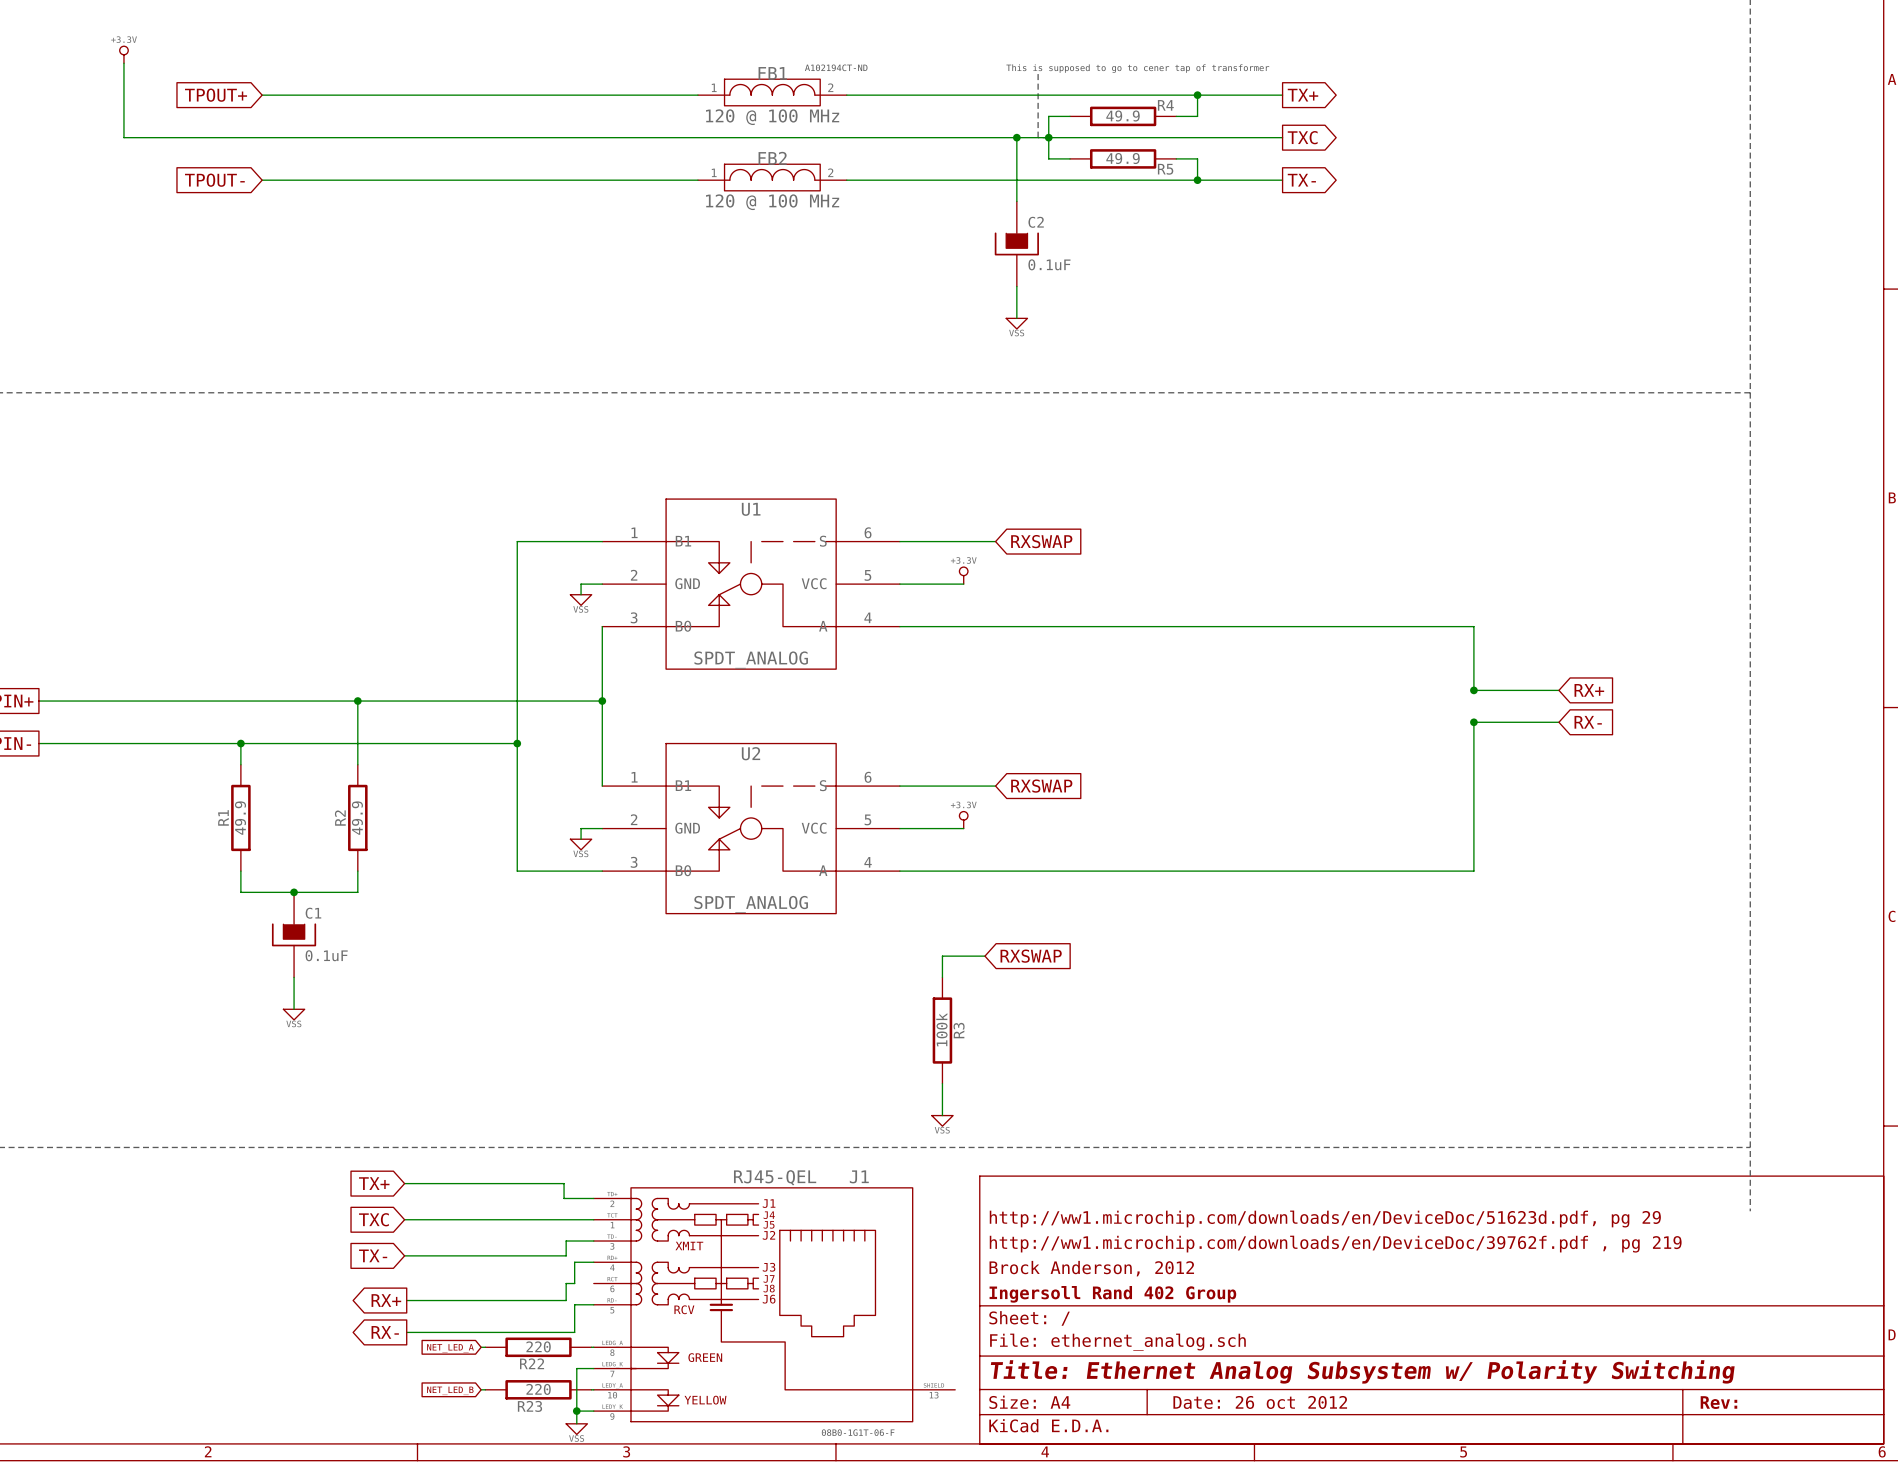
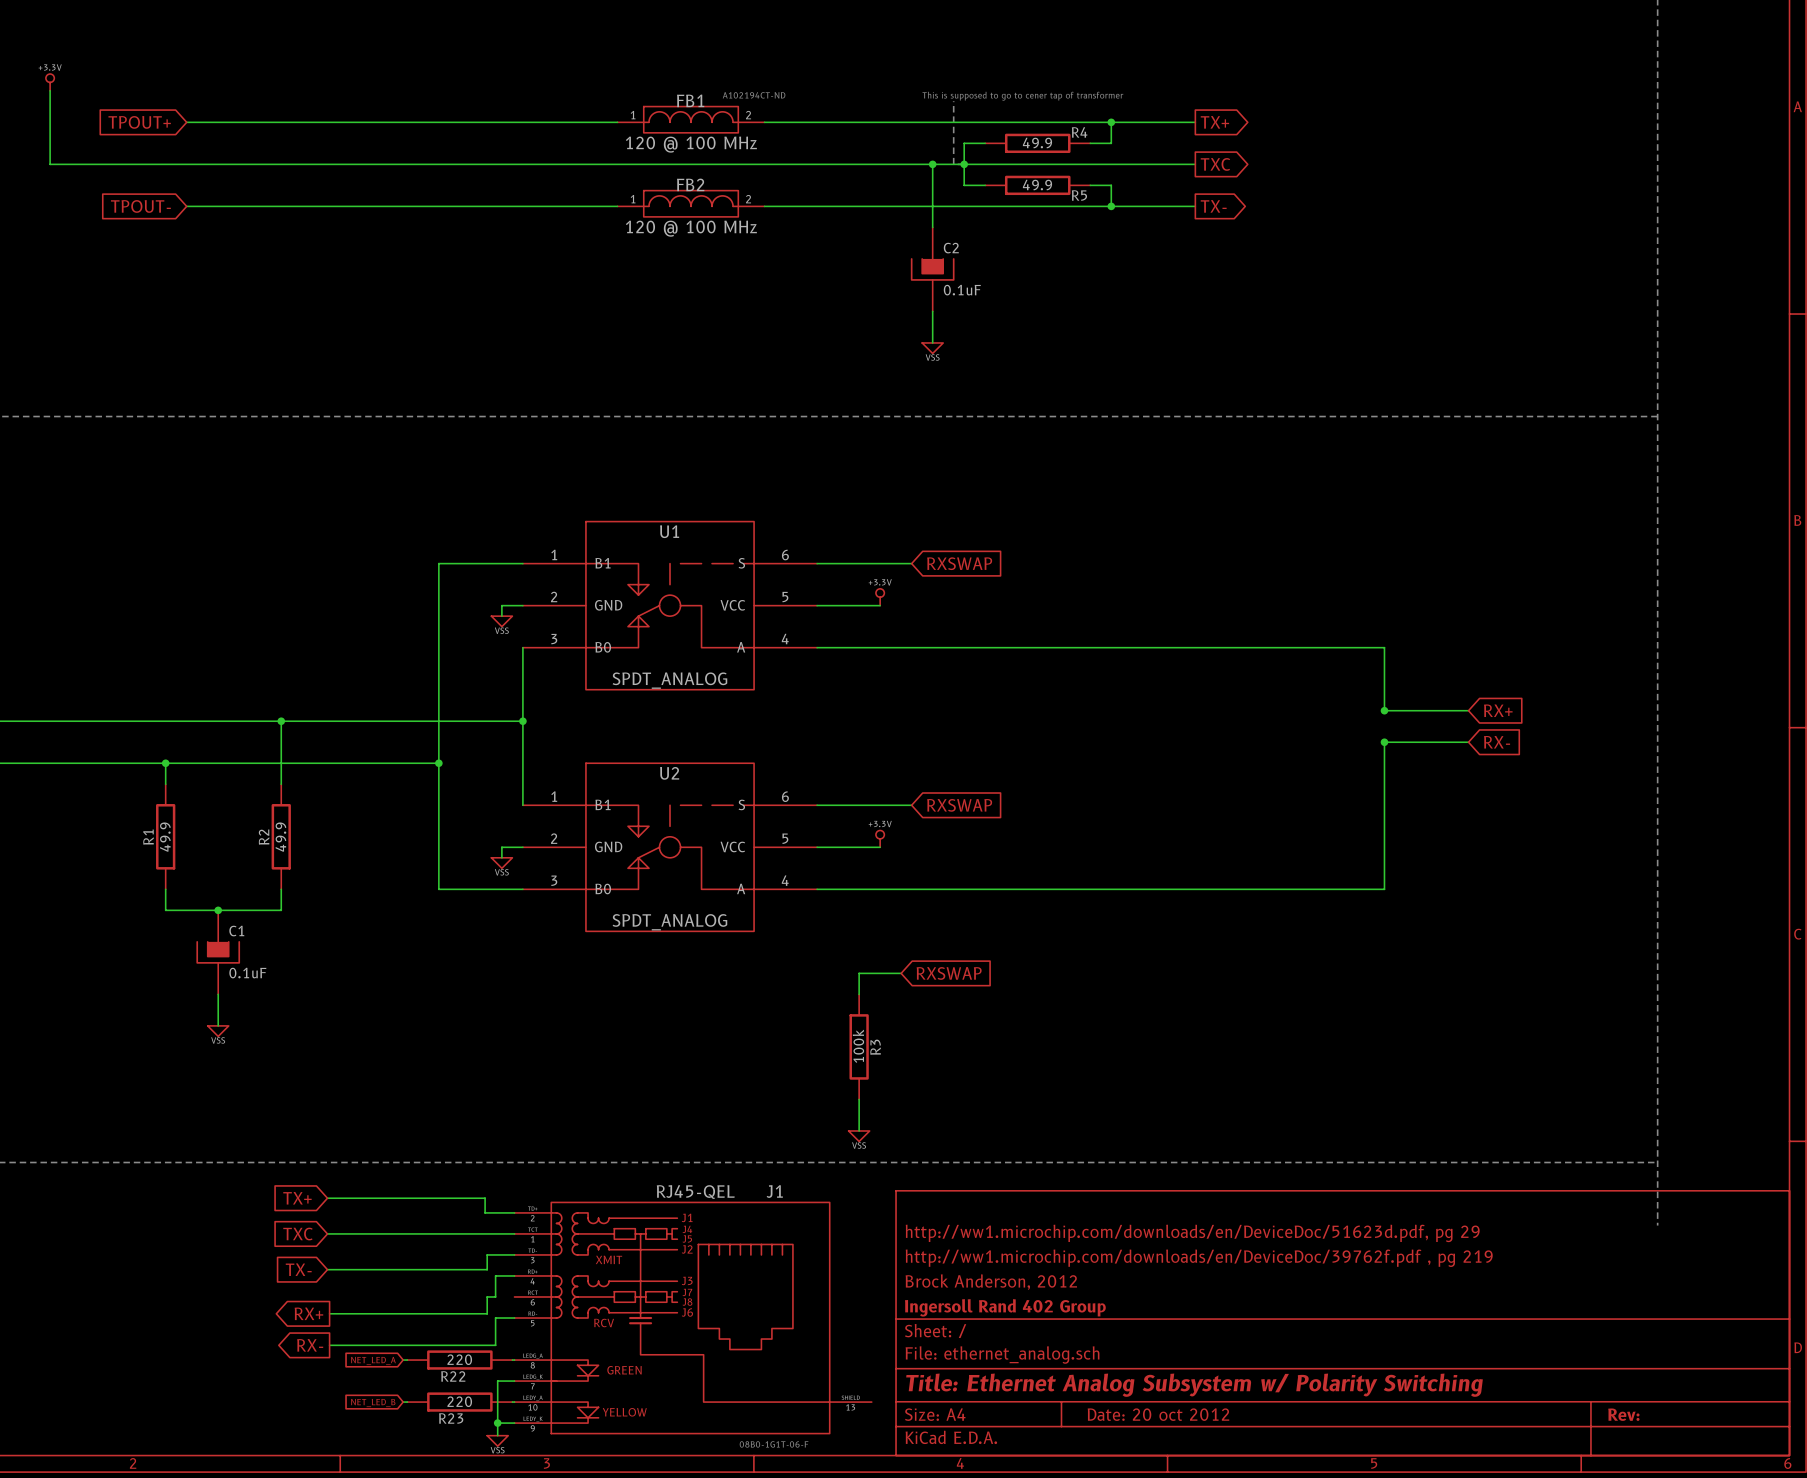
title block: Date: 26 oct 2012 (1260, 1402) -> Date: 20 oct 2012 (1158, 1414)

